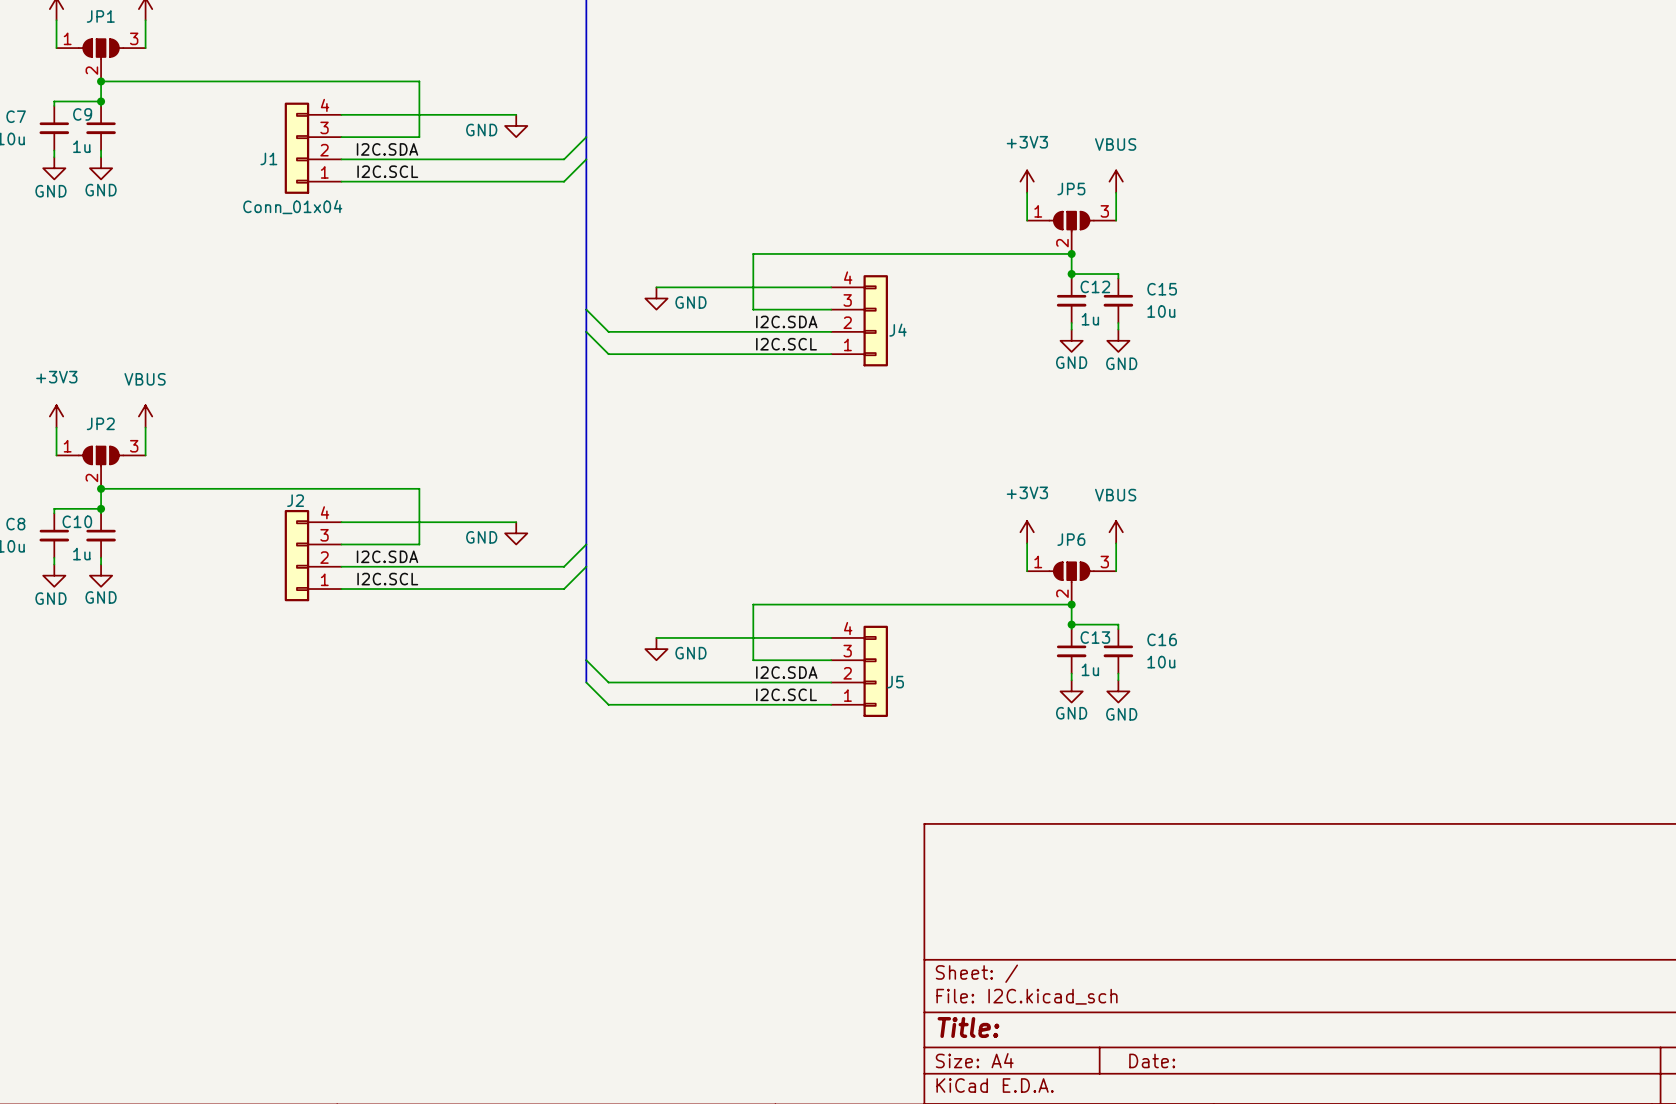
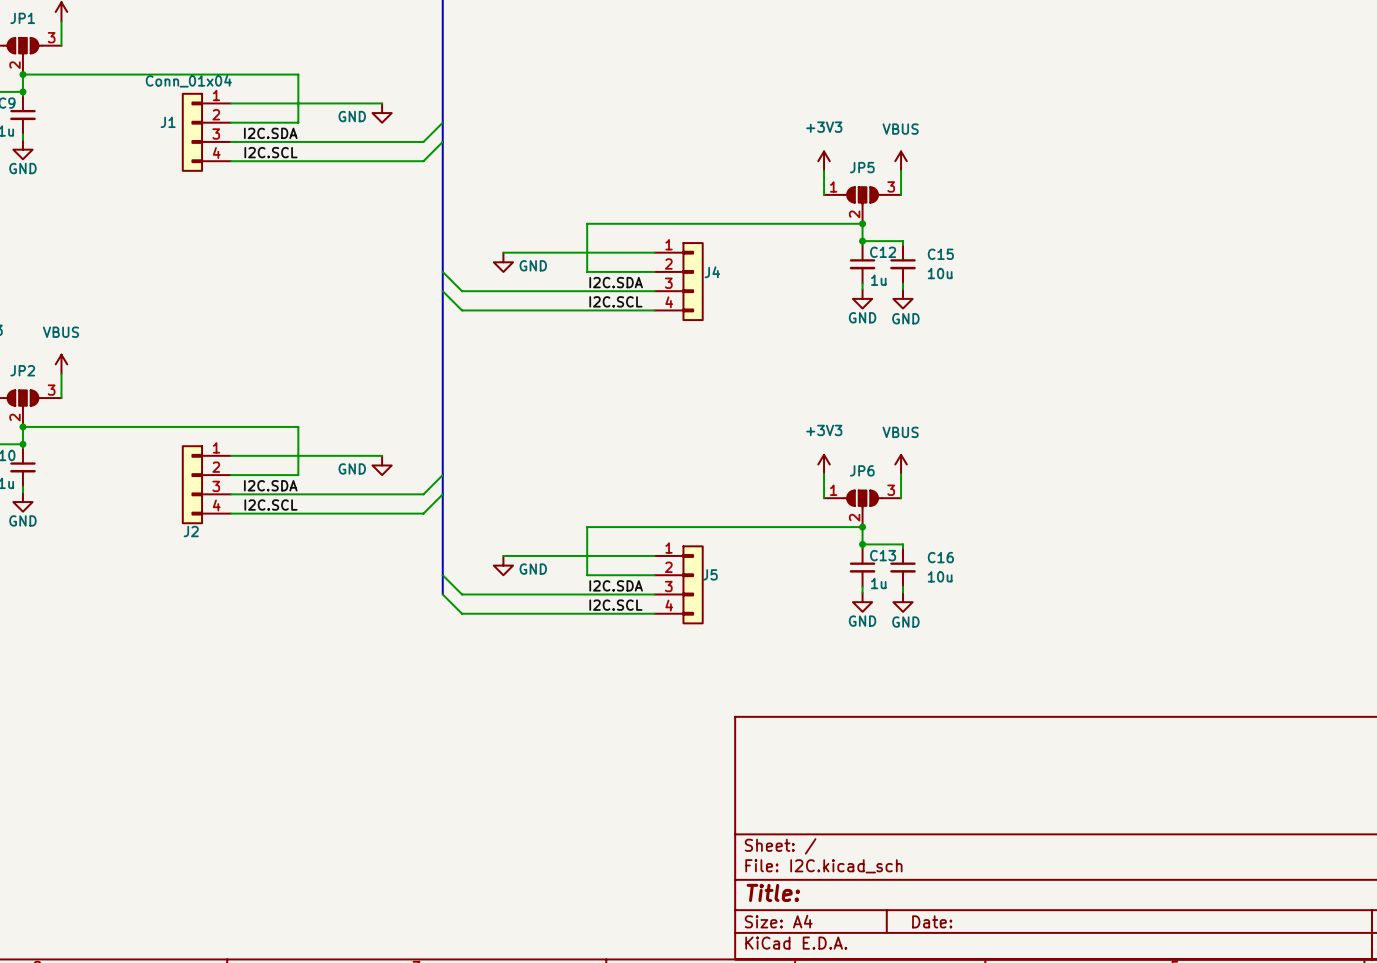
J1 flip: as is (296, 148) -> up-down (192, 132)
J4 flip: as is (875, 320) -> up-down (693, 281)
J2 flip: as is (296, 555) -> up-down (192, 484)
J5 flip: as is (875, 671) -> up-down (693, 584)

